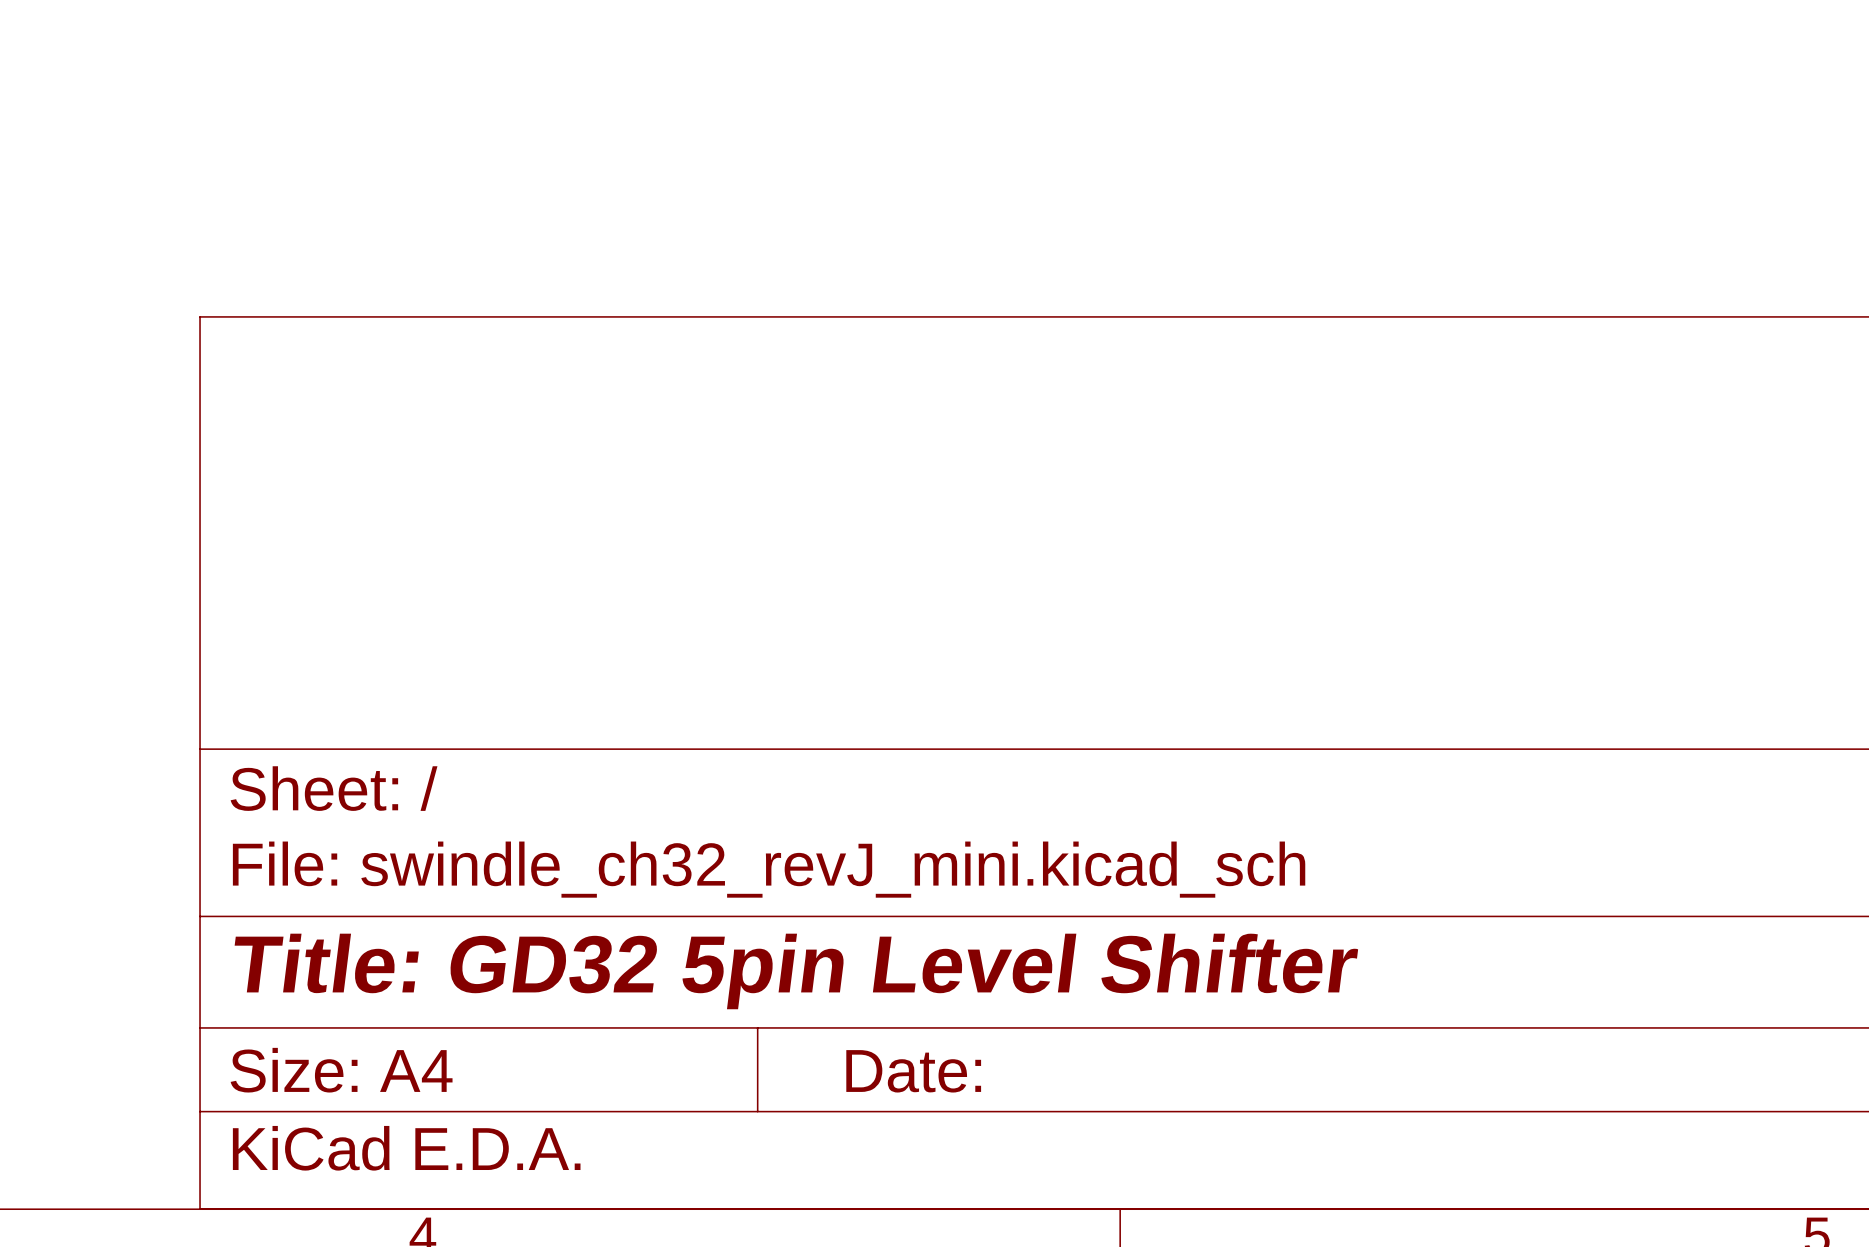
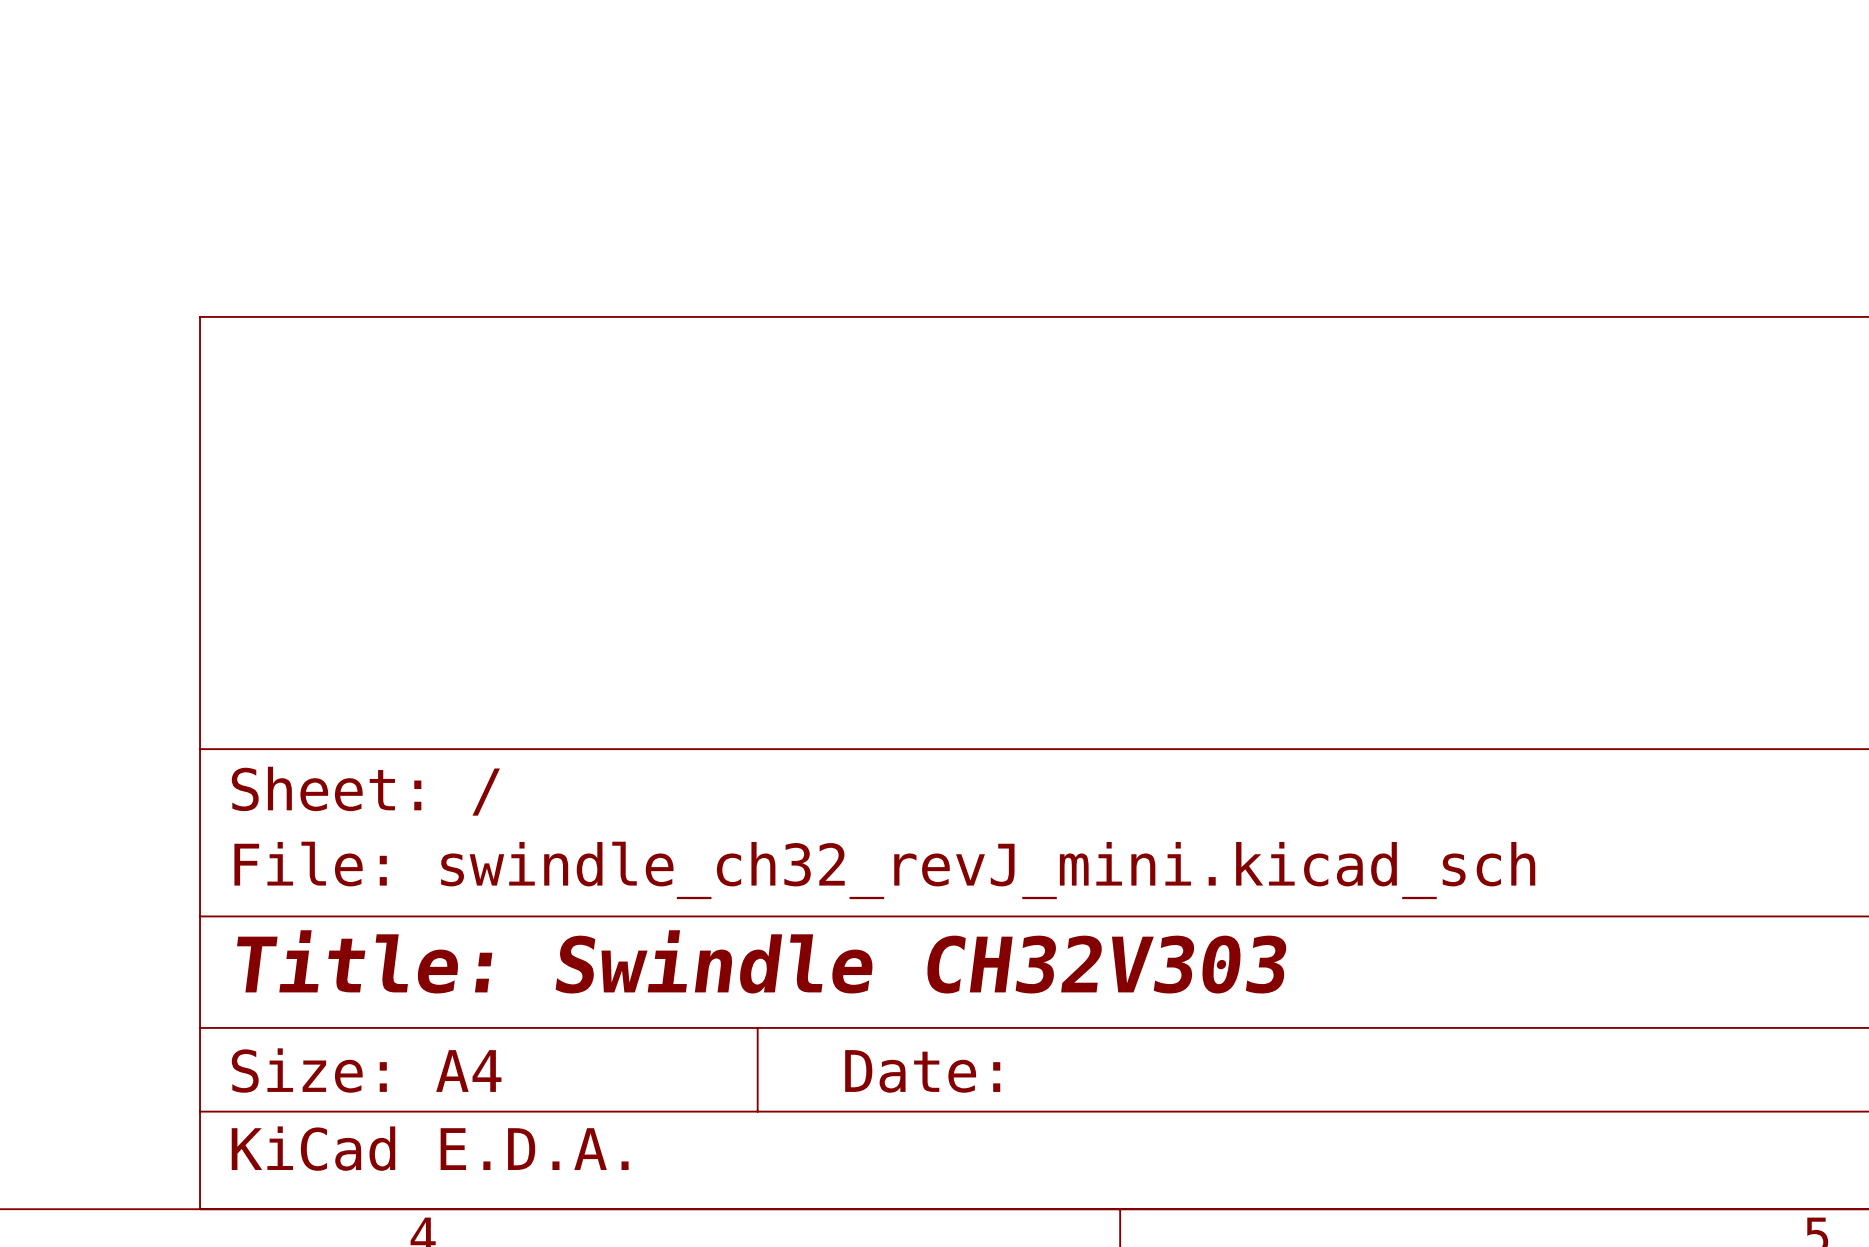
title block: Title: GD32 5pin Level Shifter (796, 971) -> Title: Swindle CH32V303 (761, 961)

